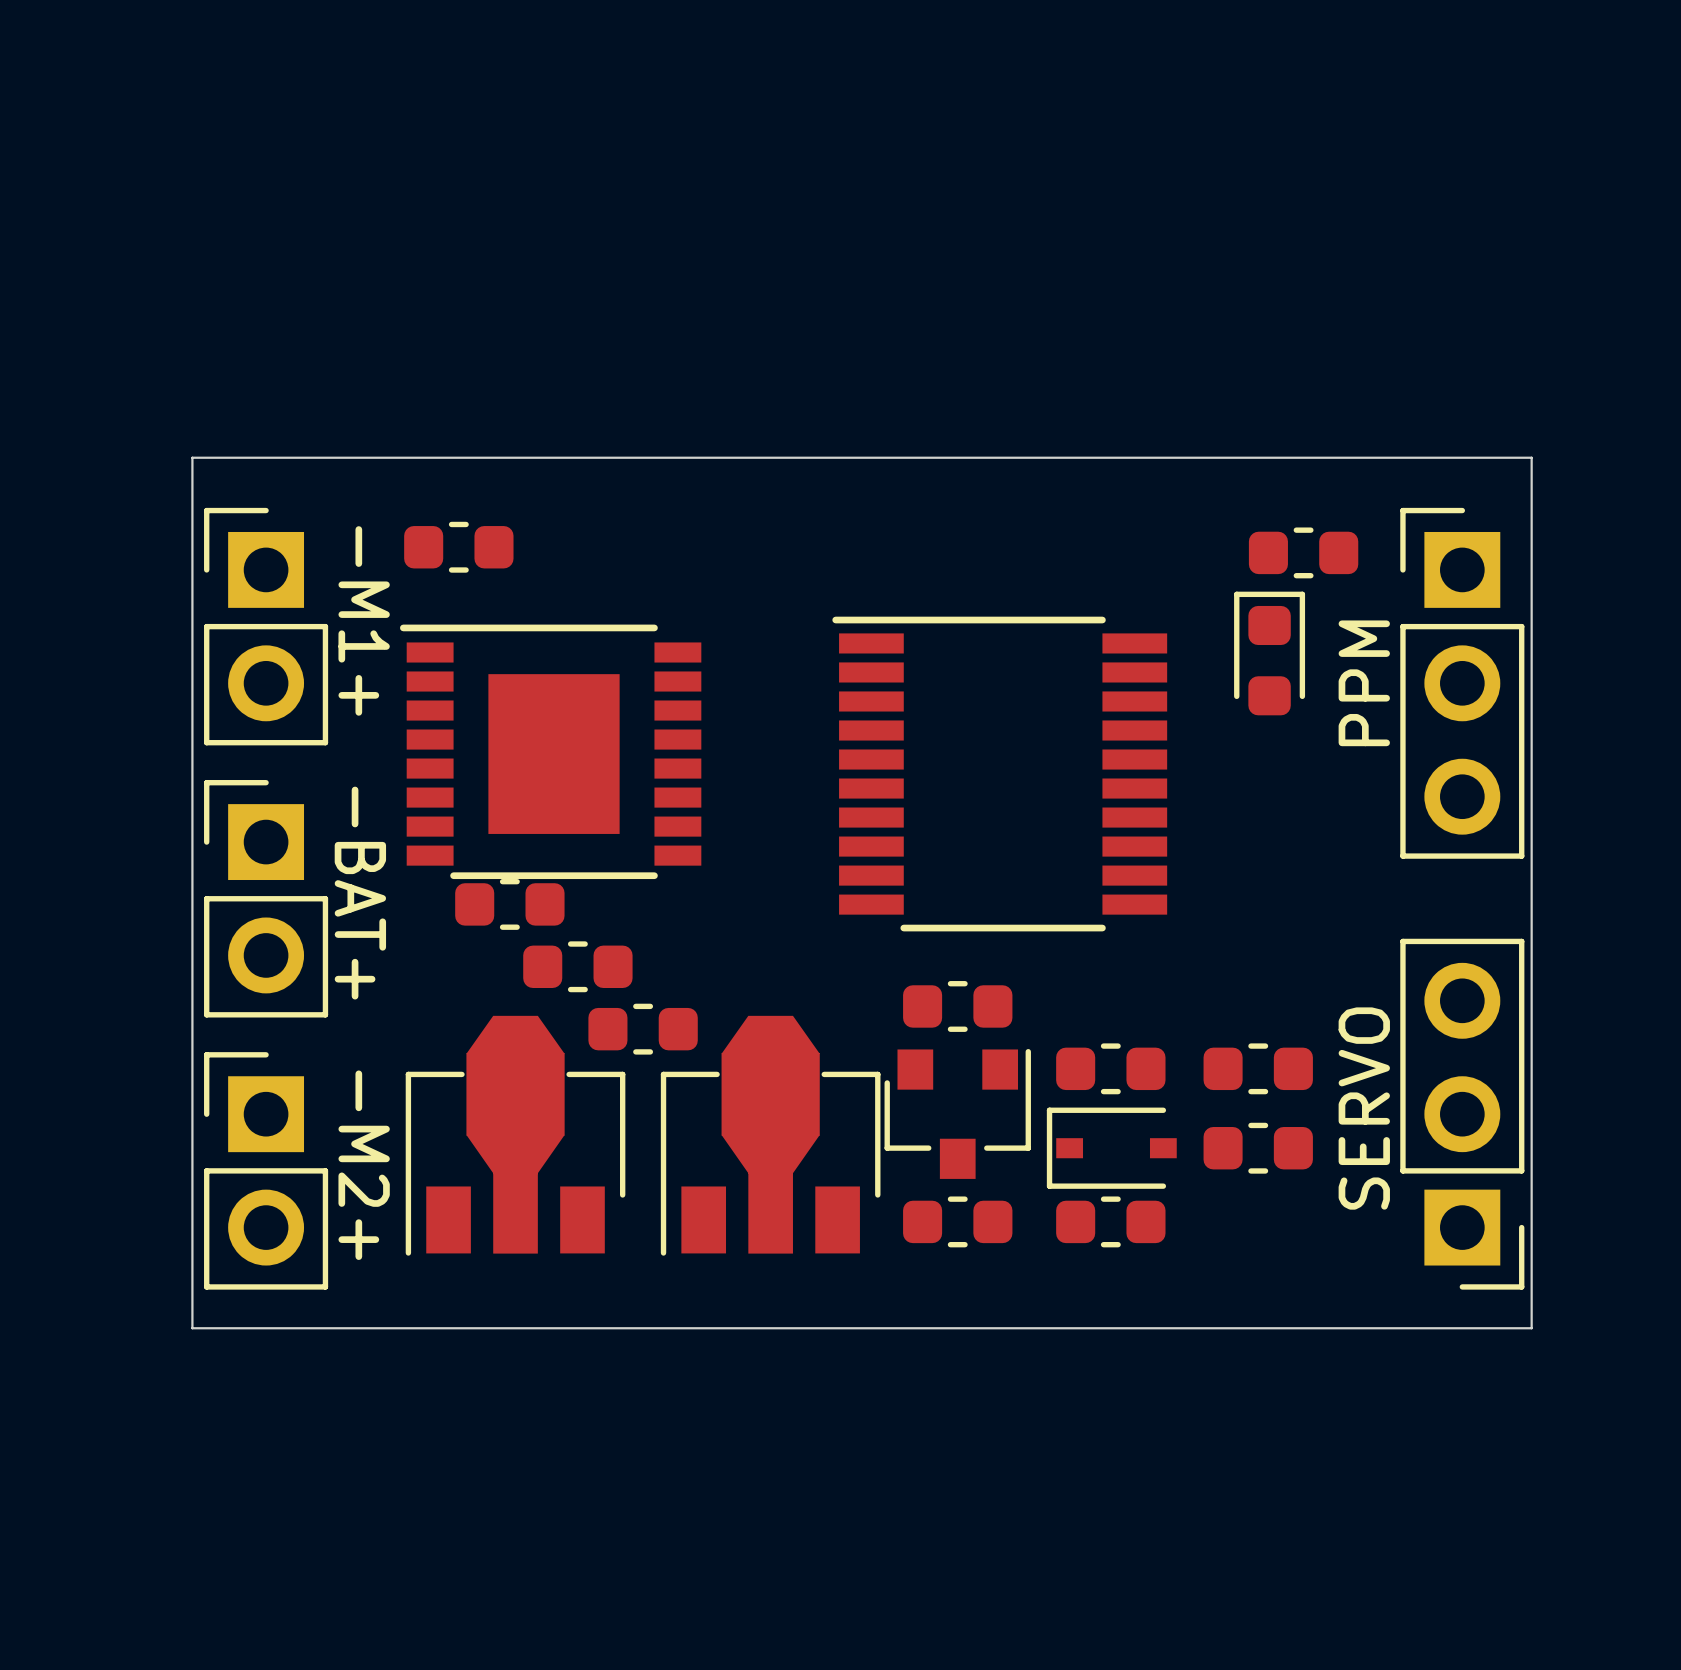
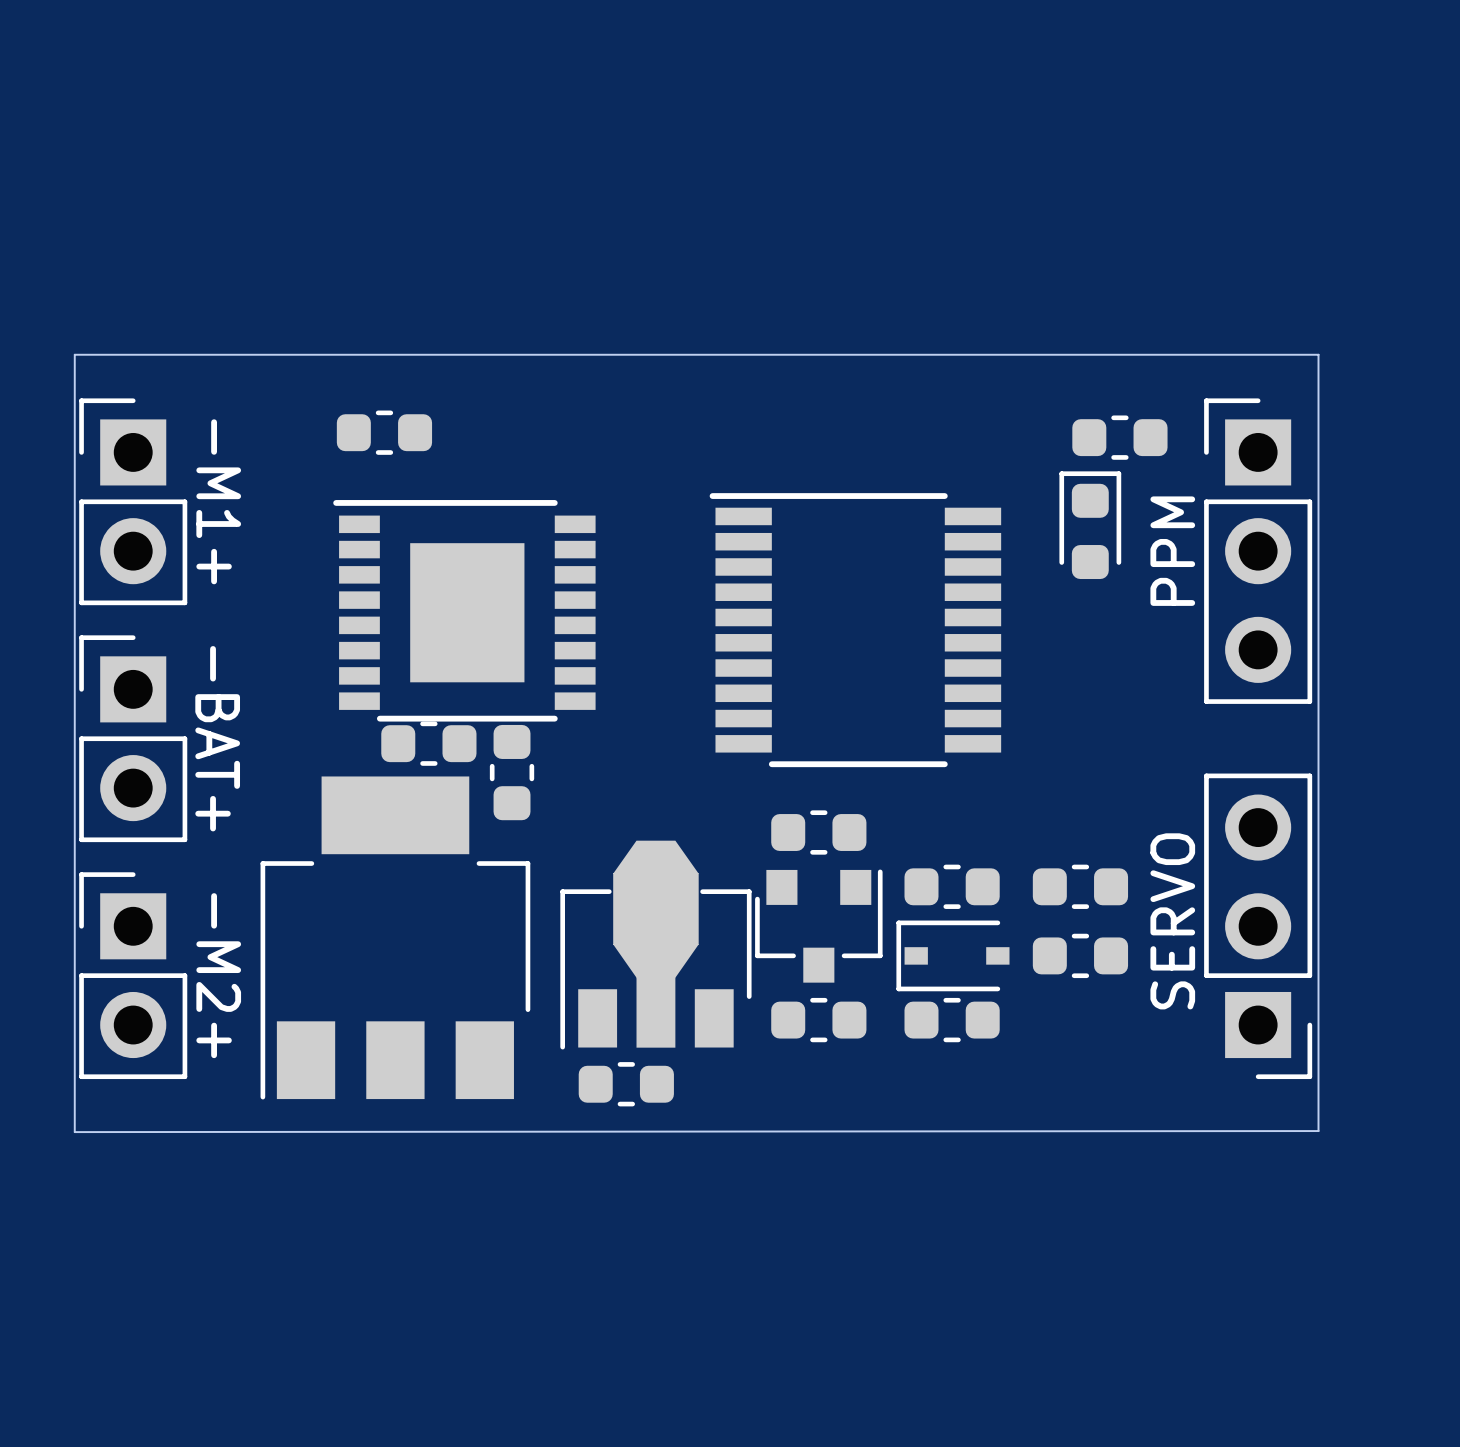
board edge: (192, 457) (192, 1328) (1531, 1328) -> (152, 354) (74, 354) (74, 1132) (1318, 1131) (1318, 1112)
text position: -M1+ (364, 620) -> -M1+ (218, 501)
part position: (266, 626) -> (133, 501)
text position: -BAT+ (360, 893) -> -BAT+ (217, 738)
part position: (266, 898) -> (133, 738)
part rotation: 0° (577, 966) -> 90° clockwise (512, 772)
part position: (643, 1029) -> (626, 1084)
part: none -> (395, 937)
part: (515, 1135) -> none
text position: -M2+ (364, 1165) -> -M2+ (218, 975)
part position: (266, 1170) -> (133, 975)

